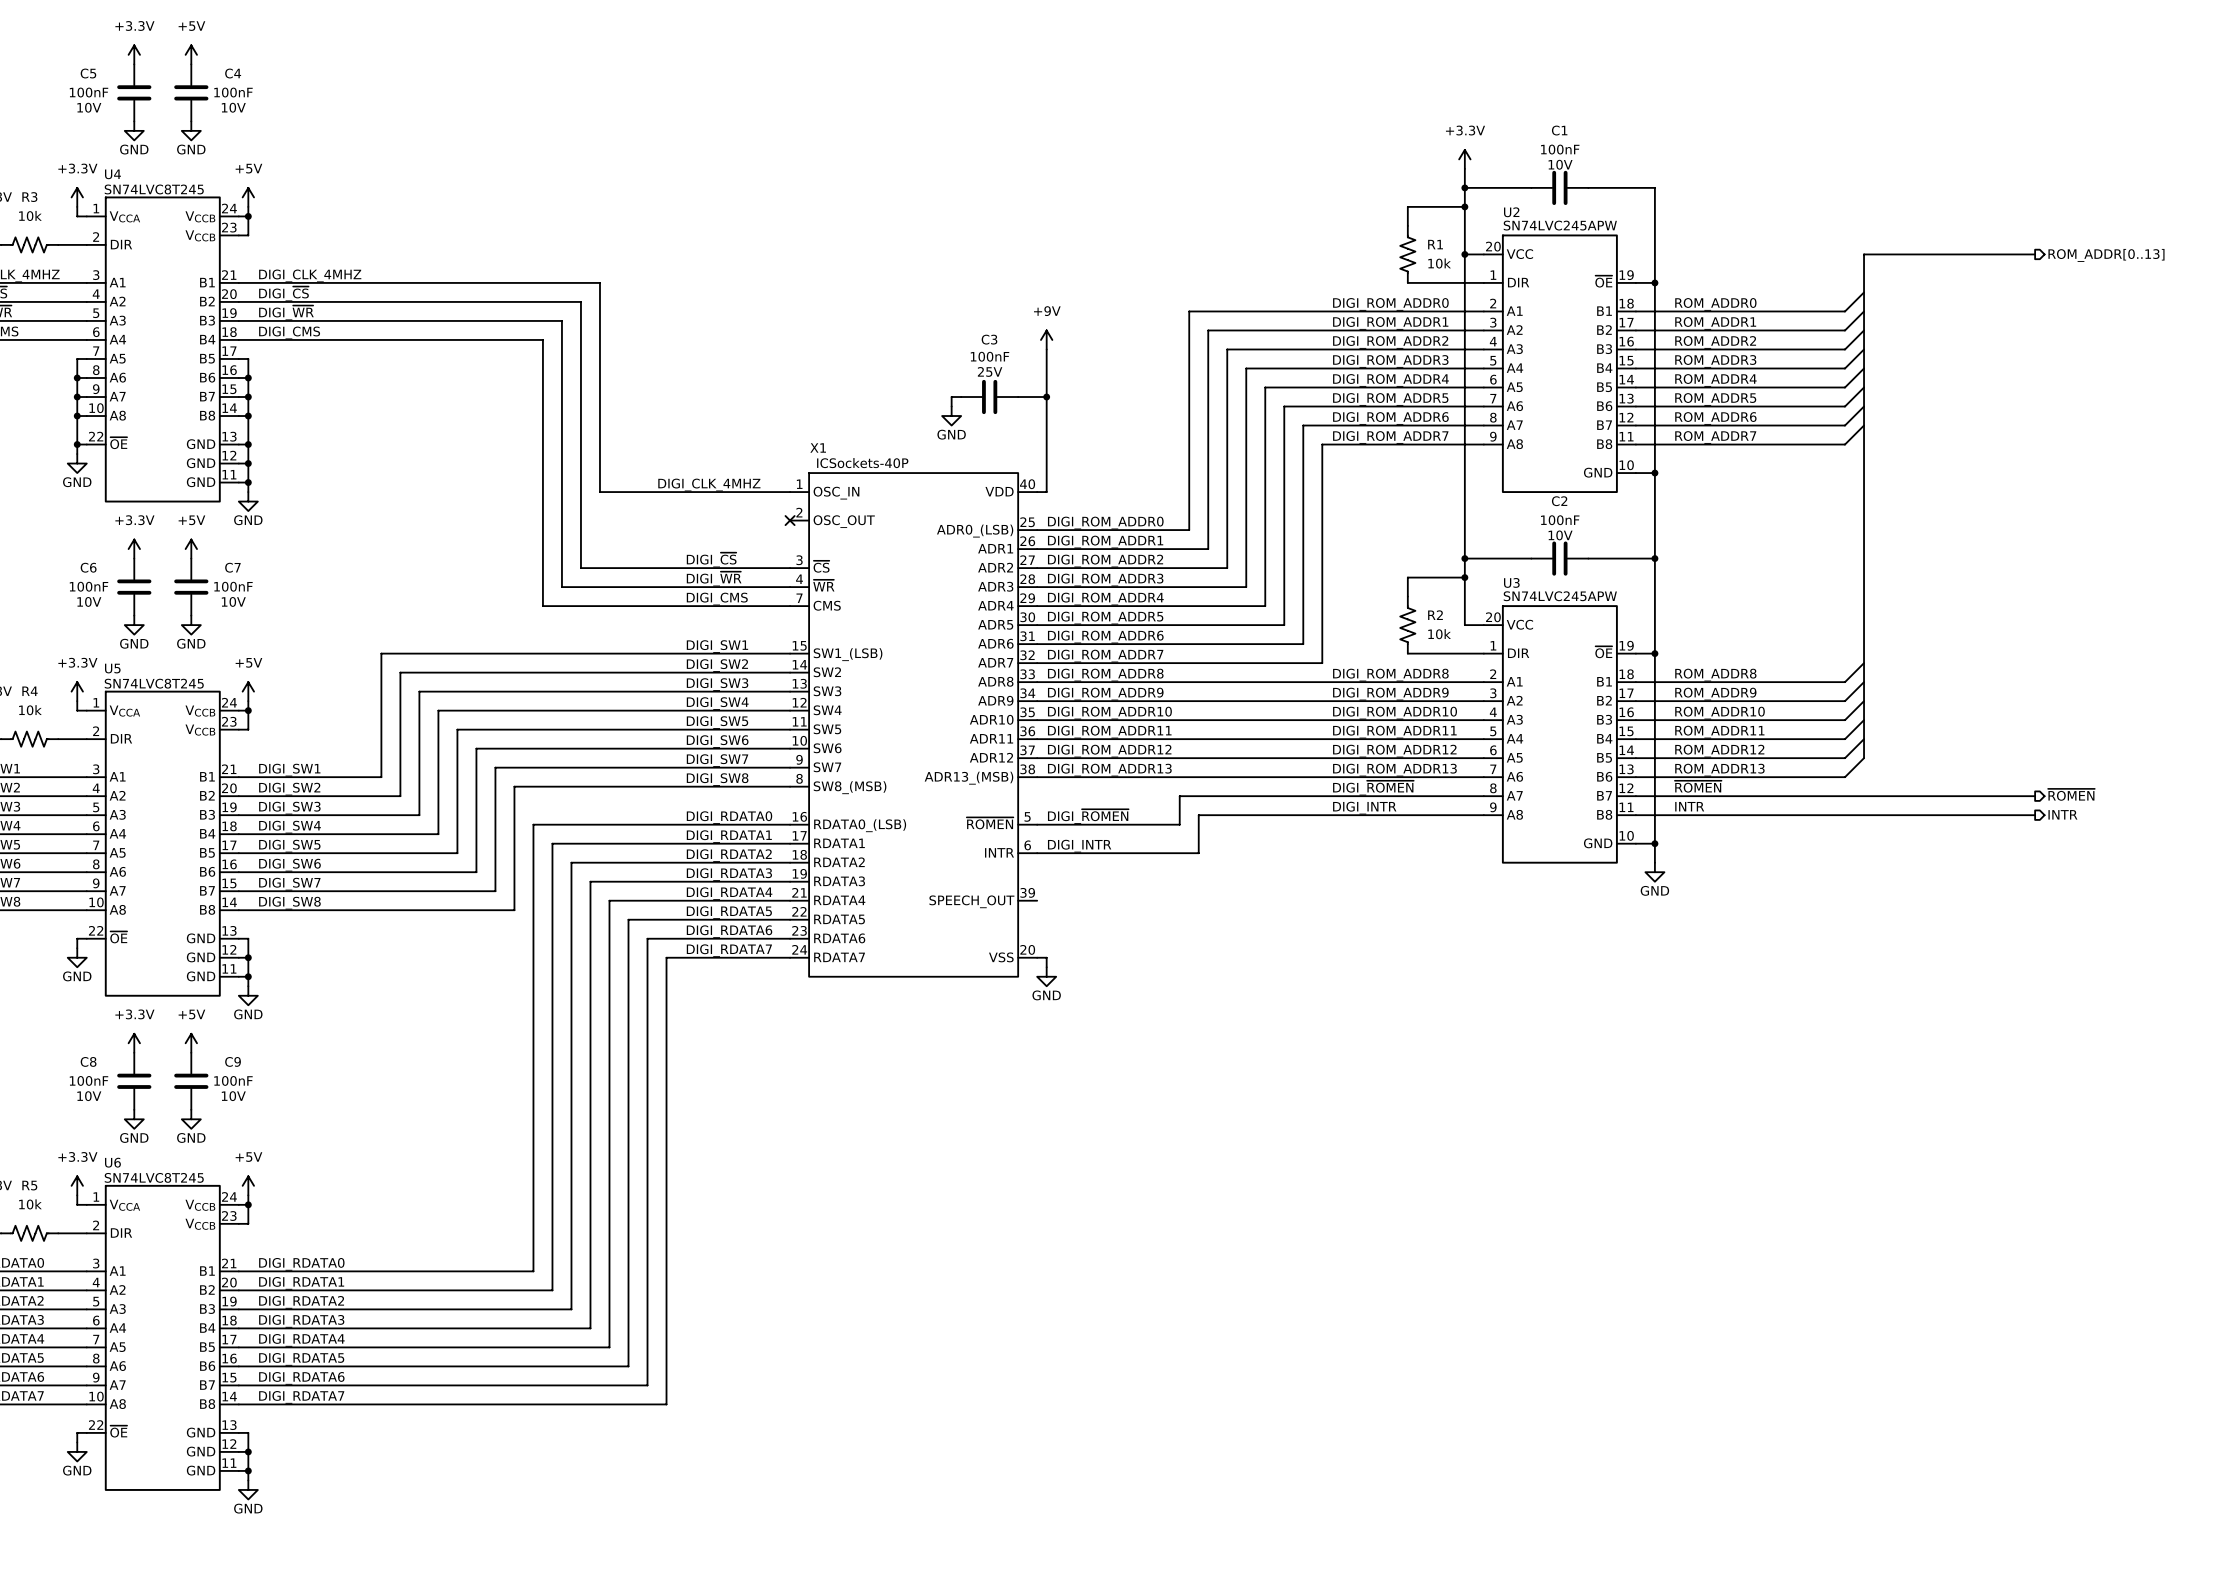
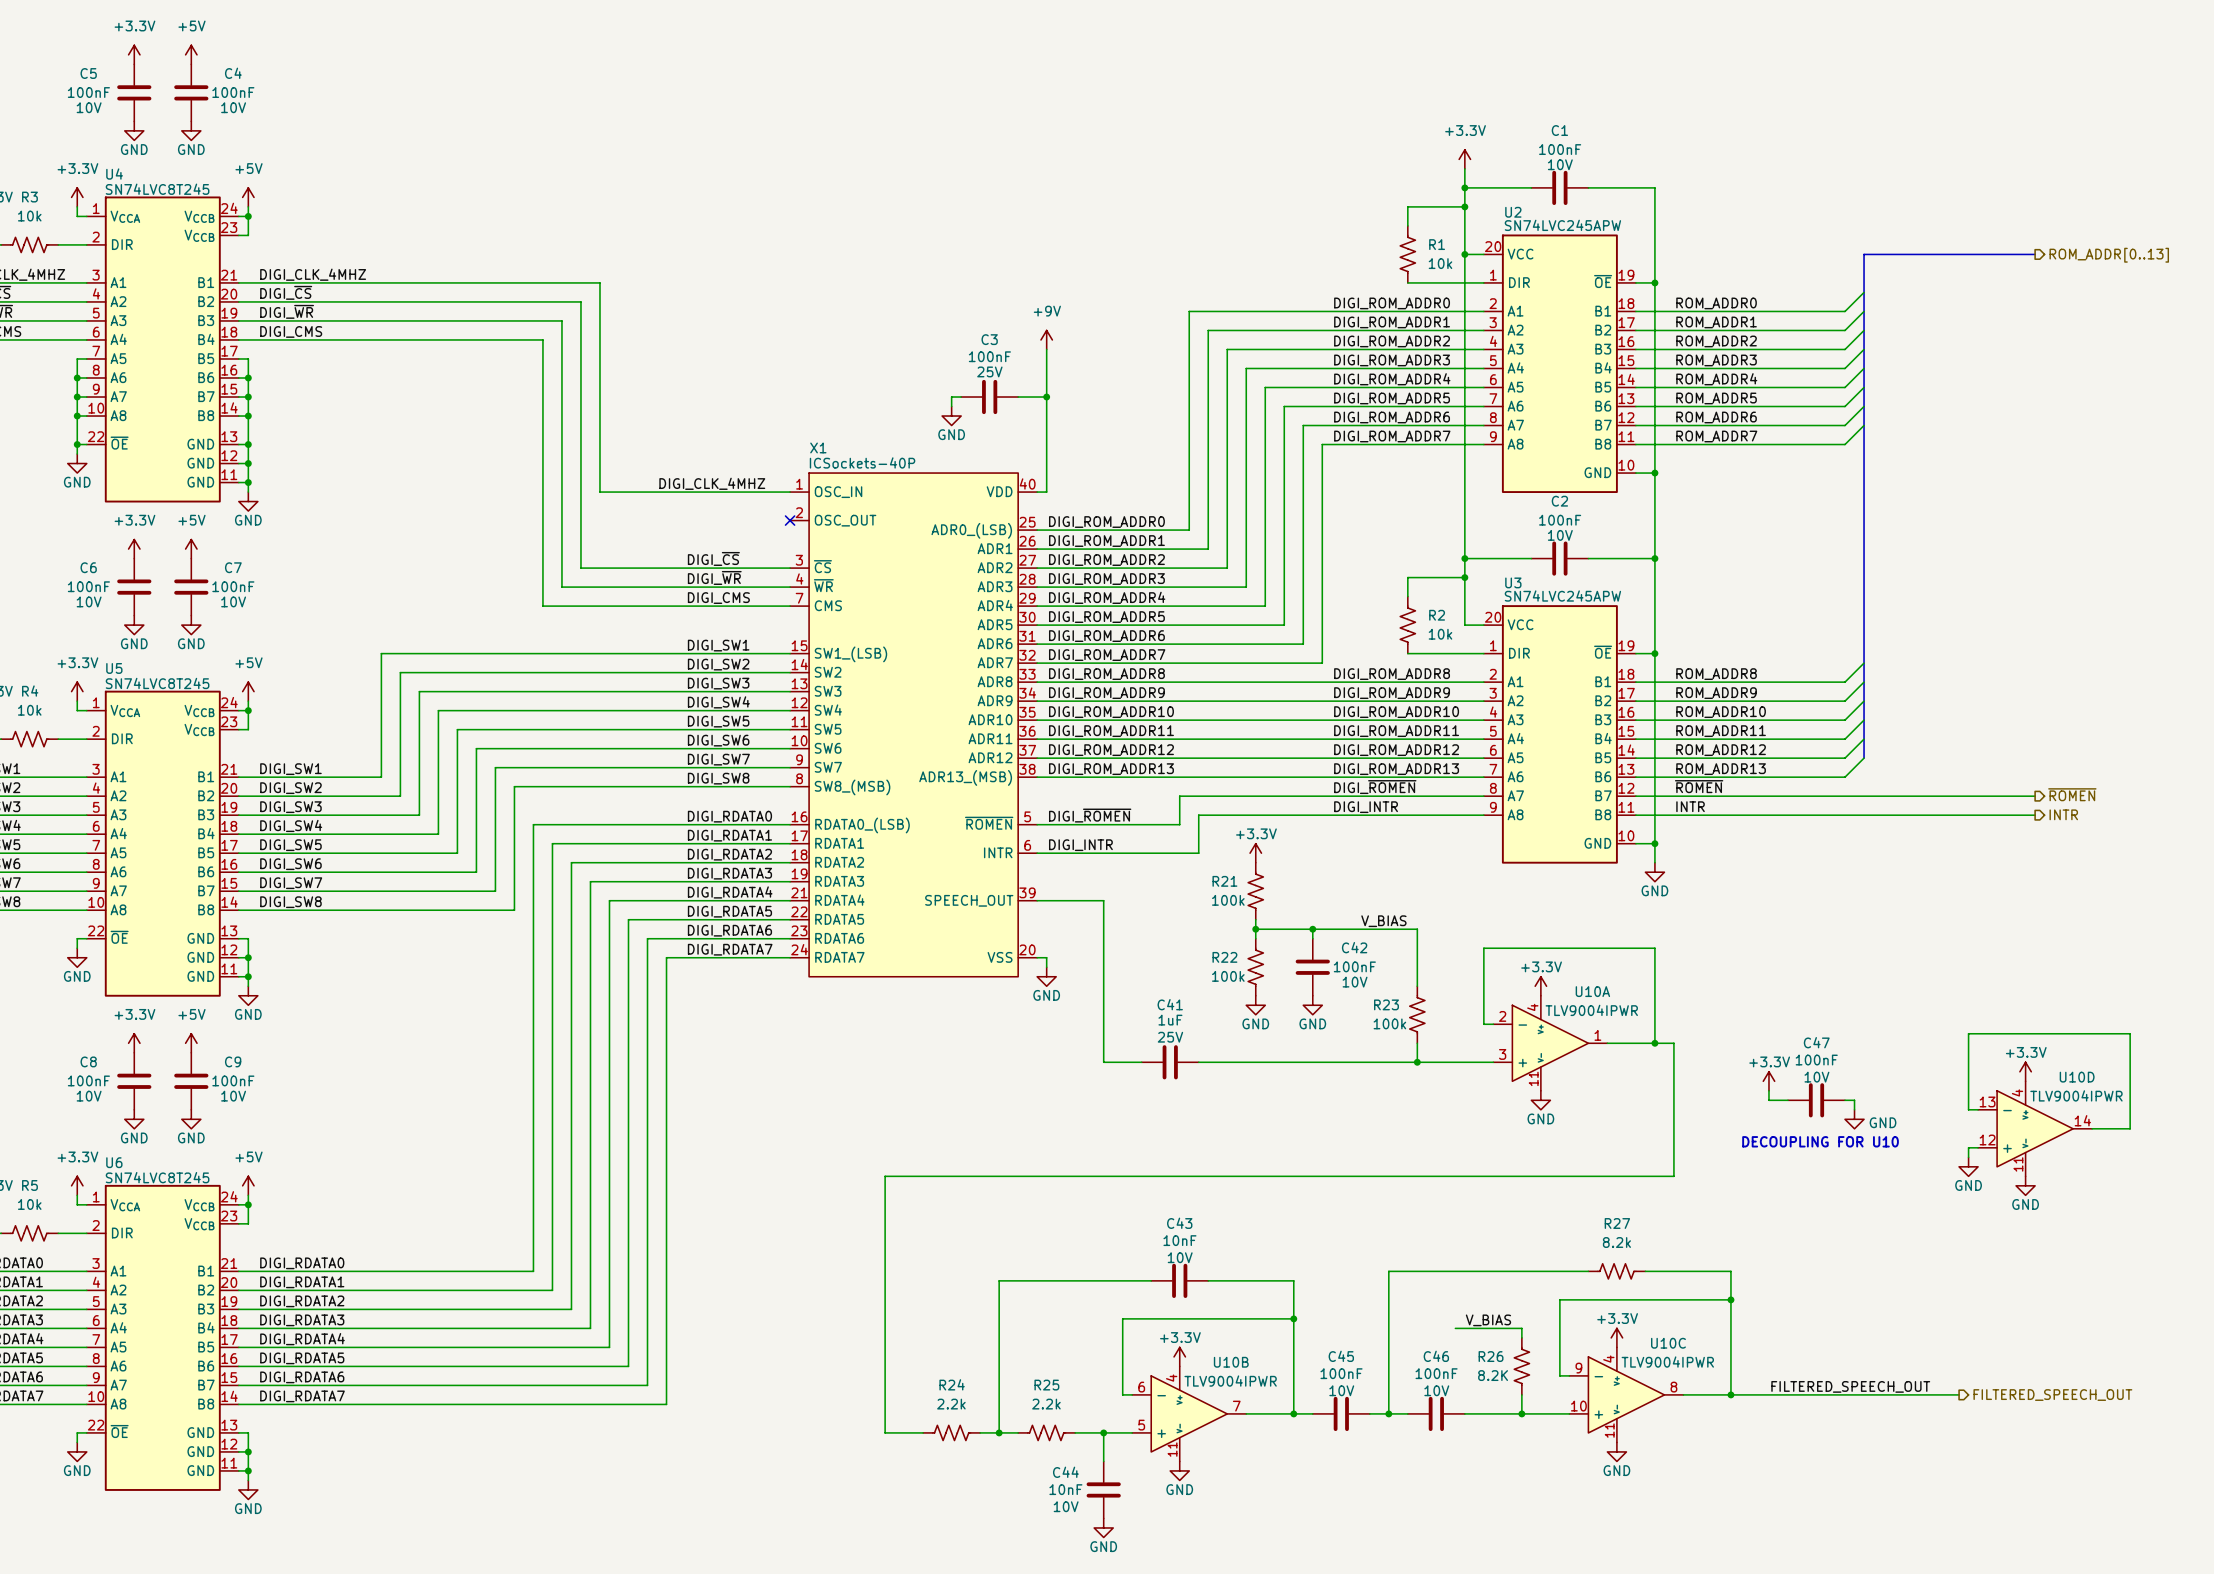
power symbol: none -> +3.3V (1255, 853)
R21: none -> 100k (1255, 891)
wire: none -> (1037, 900) (1103, 900) (1103, 1062) (1141, 1062)
wire: none -> (1255, 919) (1255, 938)
label: none -> V_BIAS (1383, 921)
wire: none -> (1255, 929) (1417, 929) (1417, 986)
junction: none -> (1255, 929)
wire: none -> (1312, 929) (1312, 938)
junction: none -> (1312, 929)
R22: none -> 100k (1255, 967)
C42: none -> 100nF (1312, 967)
power symbol: none -> +3.3V (1540, 986)
power symbol: none -> GND (1255, 1005)
power symbol: none -> GND (1312, 1005)
R23: none -> 100k (1417, 1014)
wire: none -> (1493, 1024) (1483, 1024) (1483, 948) (1654, 948) (1654, 1043)
wire: none -> (1417, 1043) (1417, 1062)
U10A: none -> TLV9004IPWR (1550, 1043)
wire: none -> (1607, 1043) (1673, 1043) (1673, 1176) (885, 1176) (885, 1432) (923, 1432)
junction: none -> (1654, 1043)
C41: none -> 1uF (1170, 1062)
wire: none -> (1198, 1062) (1493, 1062)
junction: none -> (1417, 1062)
power symbol: none -> +3.3V (2025, 1071)
power symbol: none -> +3.3V (1768, 1081)
wire: none -> (1768, 1090) (1768, 1100) (1787, 1100)
power symbol: none -> GND (1540, 1100)
C47: none -> 100nF (1816, 1100)
wire: none -> (1845, 1100) (1854, 1100) (1854, 1109)
wire: none -> (1978, 1109) (1968, 1109) (1968, 1033) (2130, 1033) (2130, 1128) (2092, 1128)
power symbol: none -> GND (1854, 1119)
U10D: none -> TLV9004IPWR (2035, 1128)
text: none -> DECOUPLING FOR U10 (1820, 1141)
wire: none -> (1978, 1147) (1968, 1147) (1968, 1157)
power symbol: none -> GND (1968, 1166)
power symbol: none -> GND (2025, 1185)
wire: none -> (1588, 1271) (1388, 1271) (1388, 1413)
R27: none -> 8.2k (1616, 1271)
wire: none -> (1645, 1271) (1730, 1271) (1730, 1394)
wire: none -> (1151, 1280) (999, 1280) (999, 1432)
C43: none -> 10nF (1179, 1280)
wire: none -> (1208, 1280) (1293, 1280) (1293, 1413)
wire: none -> (1730, 1299) (1559, 1299) (1559, 1375) (1569, 1375)
junction: none -> (1730, 1299)
wire: none -> (1293, 1318) (1122, 1318) (1122, 1394) (1132, 1394)
junction: none -> (1293, 1318)
label: none -> V_BIAS (1488, 1320)
wire: none -> (1455, 1328) (1521, 1328) (1521, 1337)
power symbol: none -> +3.3V (1616, 1337)
power symbol: none -> +3.3V (1179, 1356)
R26: none -> 8.2K (1521, 1366)
label: none -> FILTERED_SPEECH_OUT (1850, 1386)
wire: none -> (1521, 1394) (1521, 1413)
U10C: none -> TLV9004IPWR (1626, 1394)
wire: none -> (1683, 1394) (1959, 1394)
junction: none -> (1730, 1394)
hierarchical label: none -> FILTERED_SPEECH_OUT (2052, 1395)
U10B: none -> TLV9004IPWR (1189, 1413)
wire: none -> (1246, 1413) (1312, 1413)
junction: none -> (1293, 1413)
C45: none -> 100nF (1341, 1413)
wire: none -> (1369, 1413) (1407, 1413)
junction: none -> (1388, 1413)
C46: none -> 100nF (1436, 1413)
wire: none -> (1464, 1413) (1569, 1413)
junction: none -> (1521, 1413)
R24: none -> 2.2k (951, 1432)
wire: none -> (980, 1432) (1018, 1432)
junction: none -> (999, 1432)
R25: none -> 2.2k (1046, 1432)
wire: none -> (1075, 1432) (1132, 1432)
wire: none -> (1103, 1432) (1103, 1461)
junction: none -> (1103, 1432)
power symbol: none -> GND (1616, 1451)
power symbol: none -> GND (1179, 1470)
C44: none -> 10nF (1103, 1489)
power symbol: none -> GND (1103, 1527)

